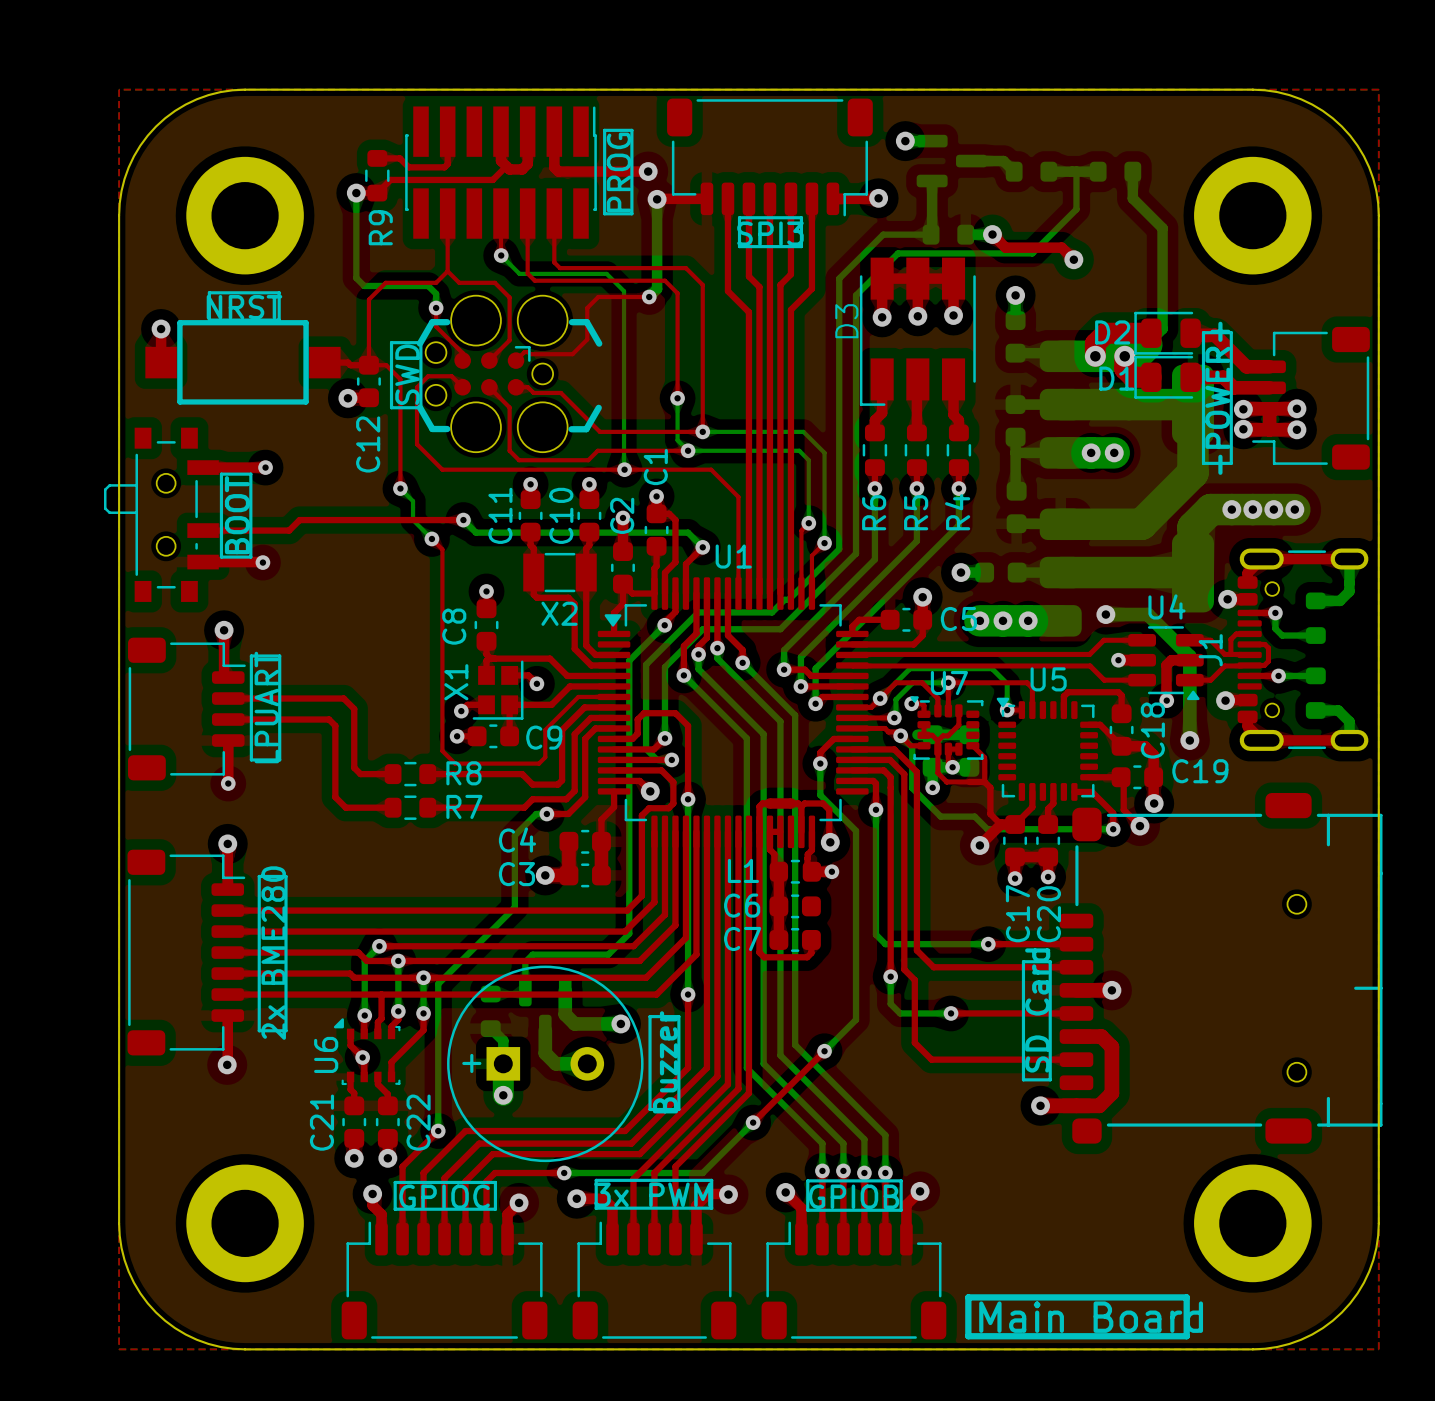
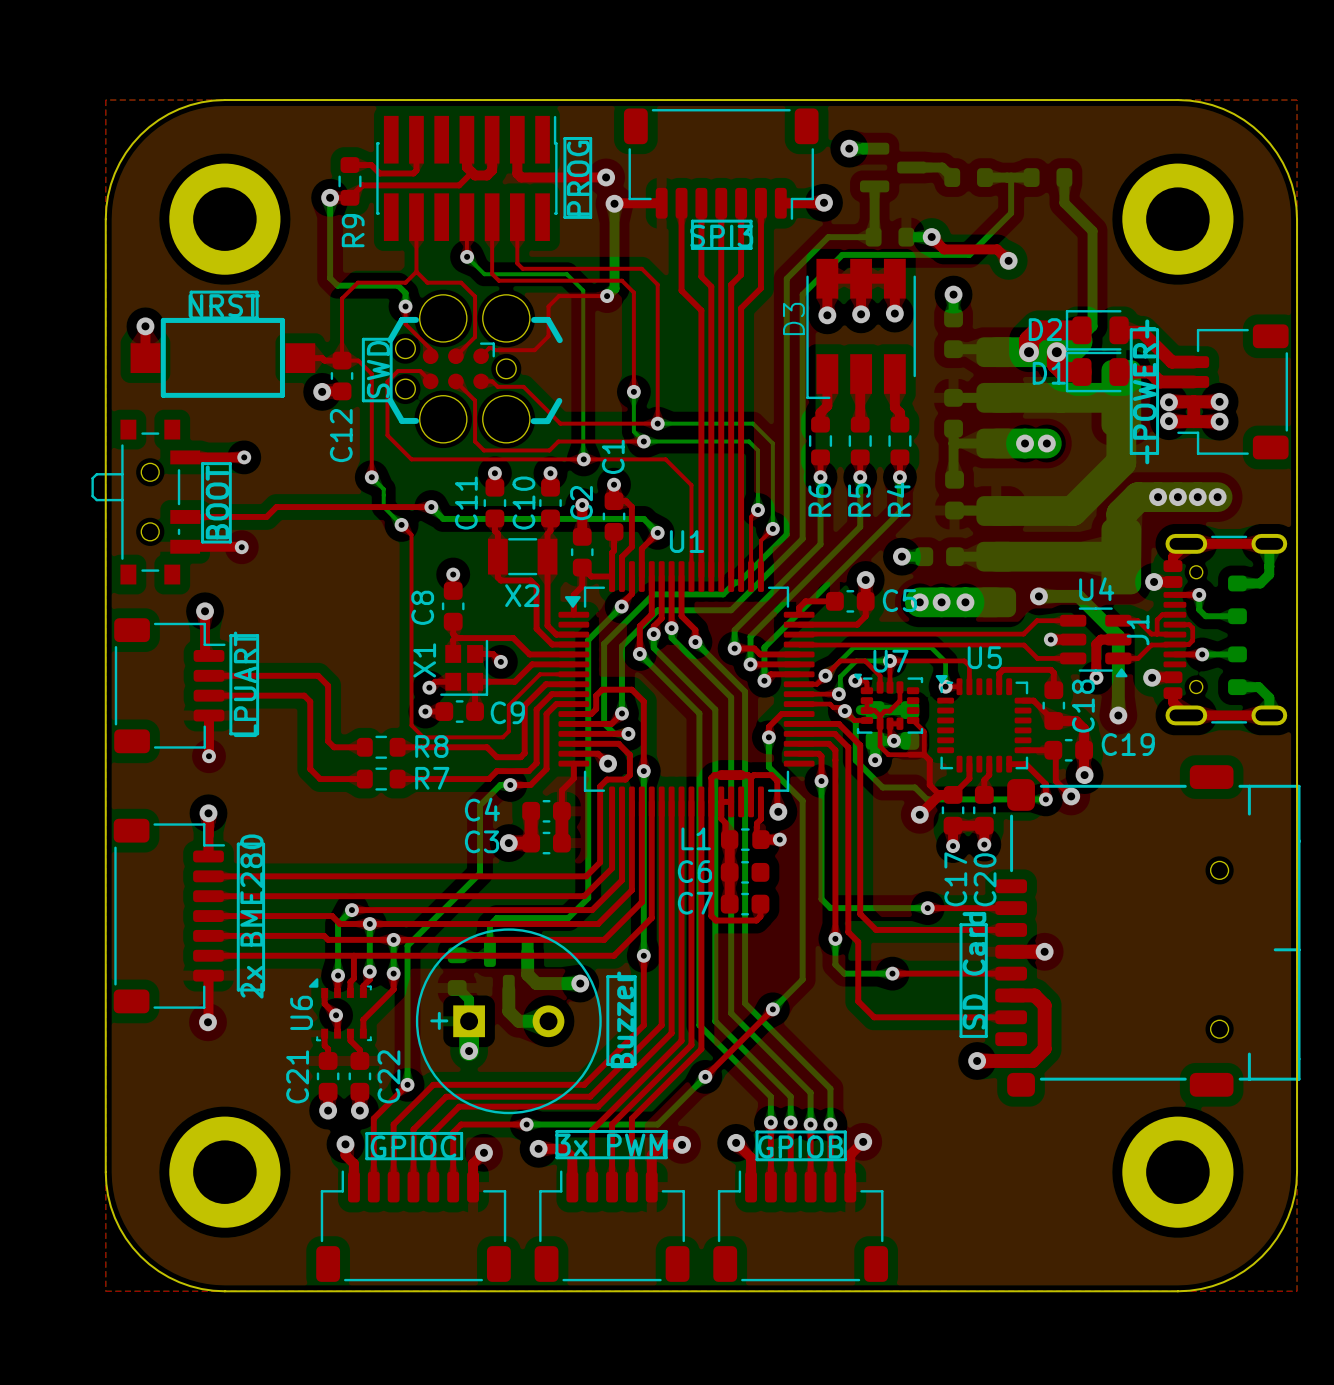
line: (968, 1297) (1186, 1297) (1186, 1336) (968, 1336) (968, 1297) -> none
text: Main Board (1091, 1317) -> none

